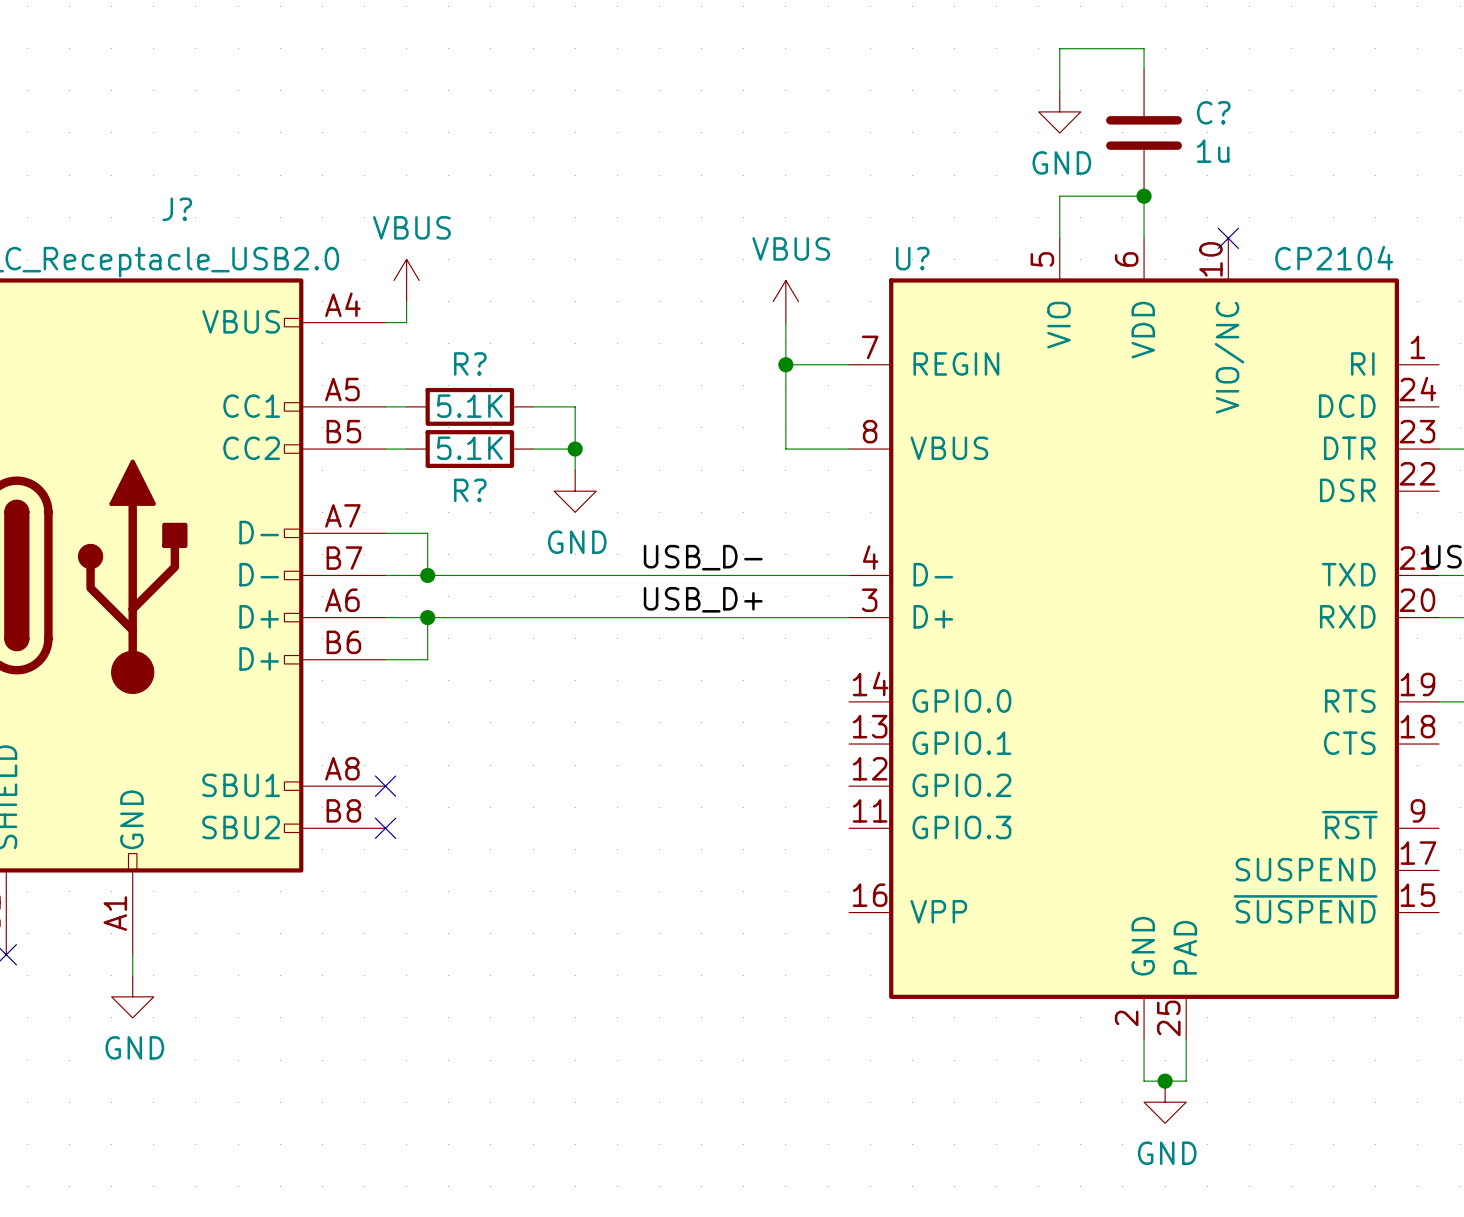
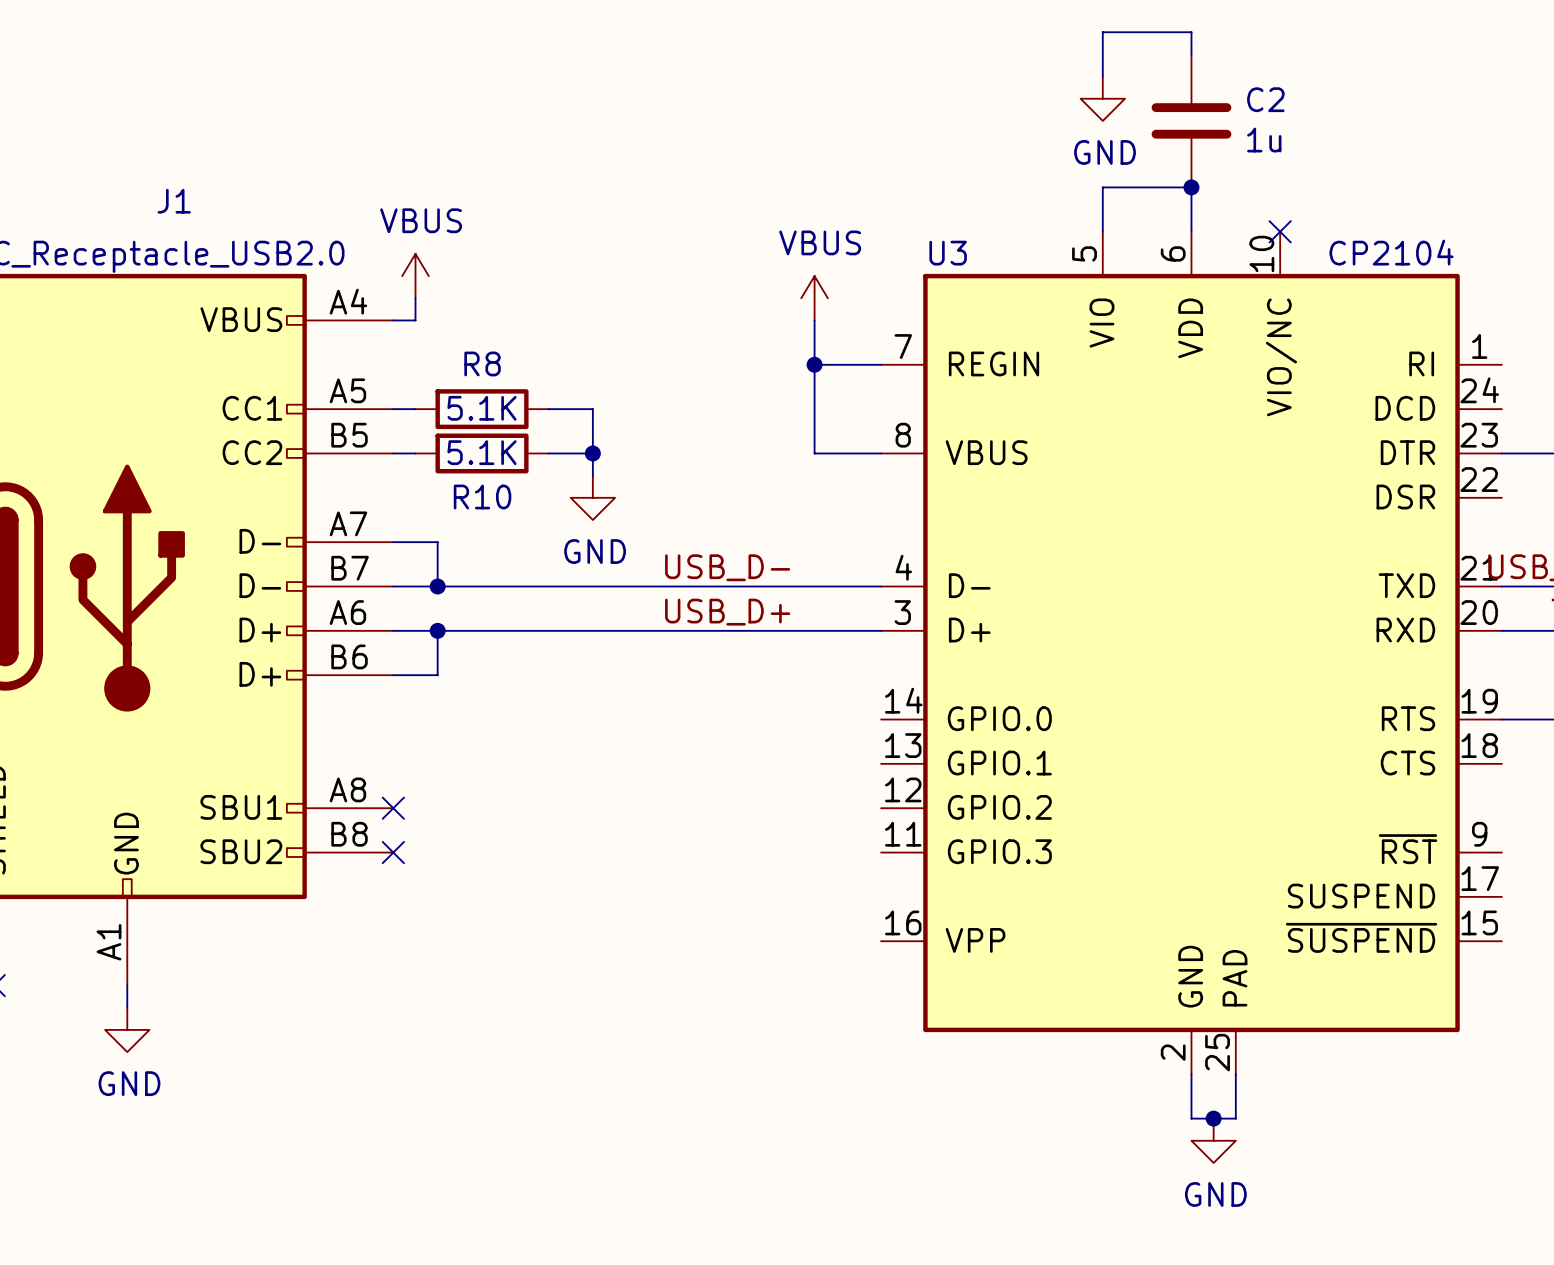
C? name: C? (1213, 112) -> C2 (1265, 99)
J? name: J? (177, 209) -> J1 (174, 201)
U? name: U? (912, 258) -> U3 (948, 253)
R? name: R? (470, 363) -> R8 (482, 363)
R? name: R? (470, 490) -> R10 (482, 496)

